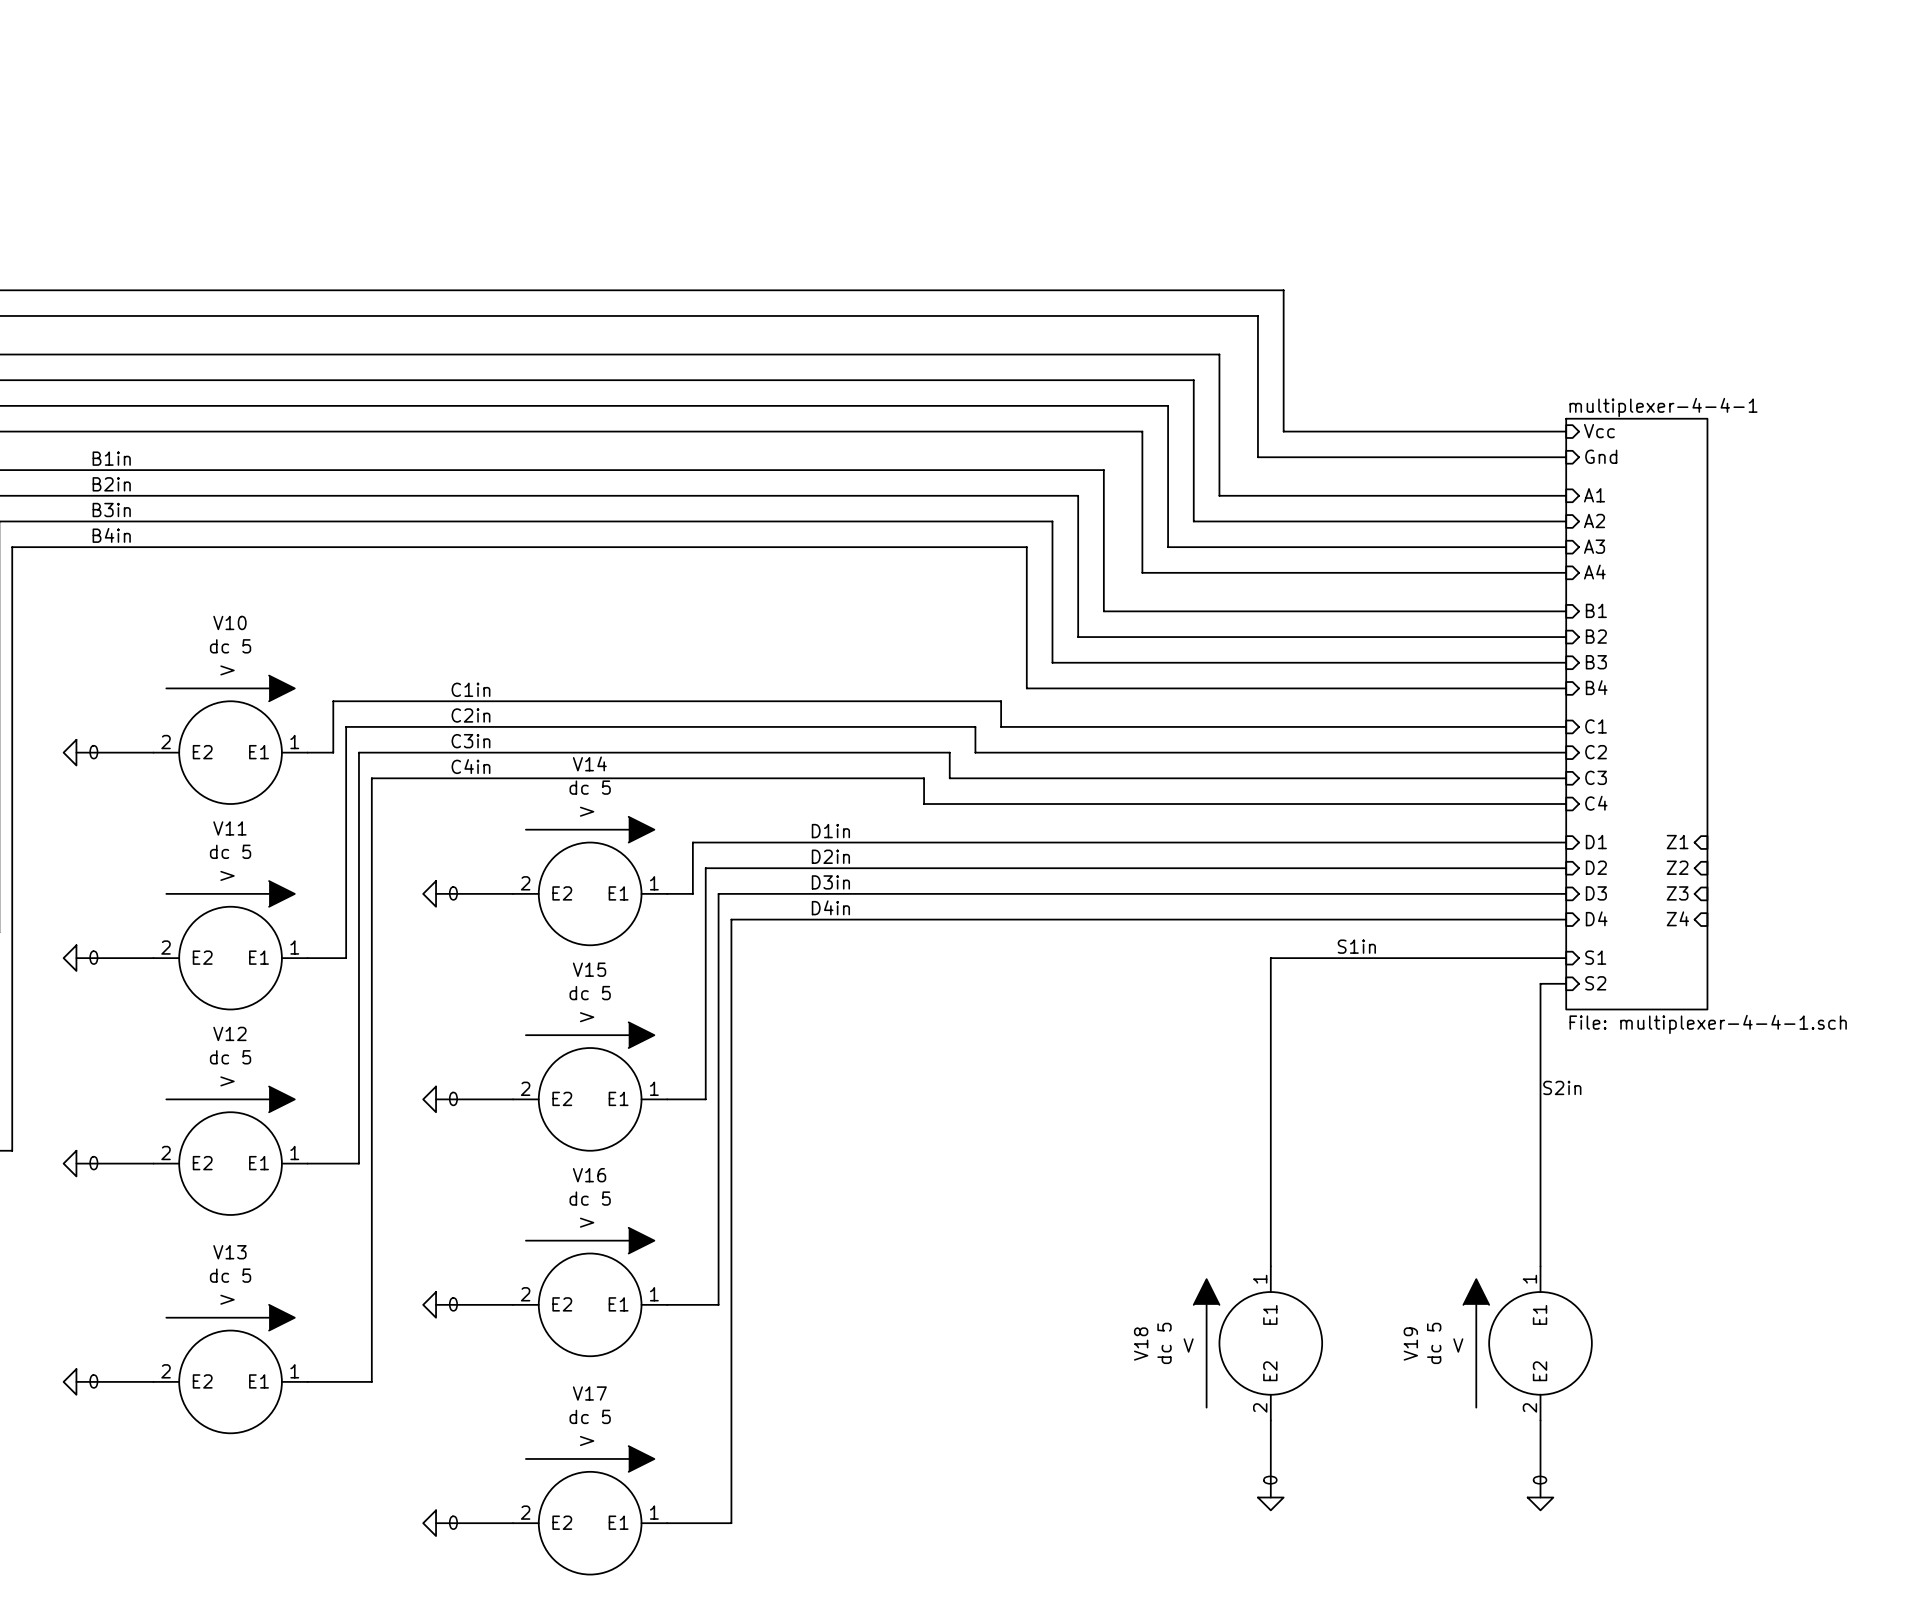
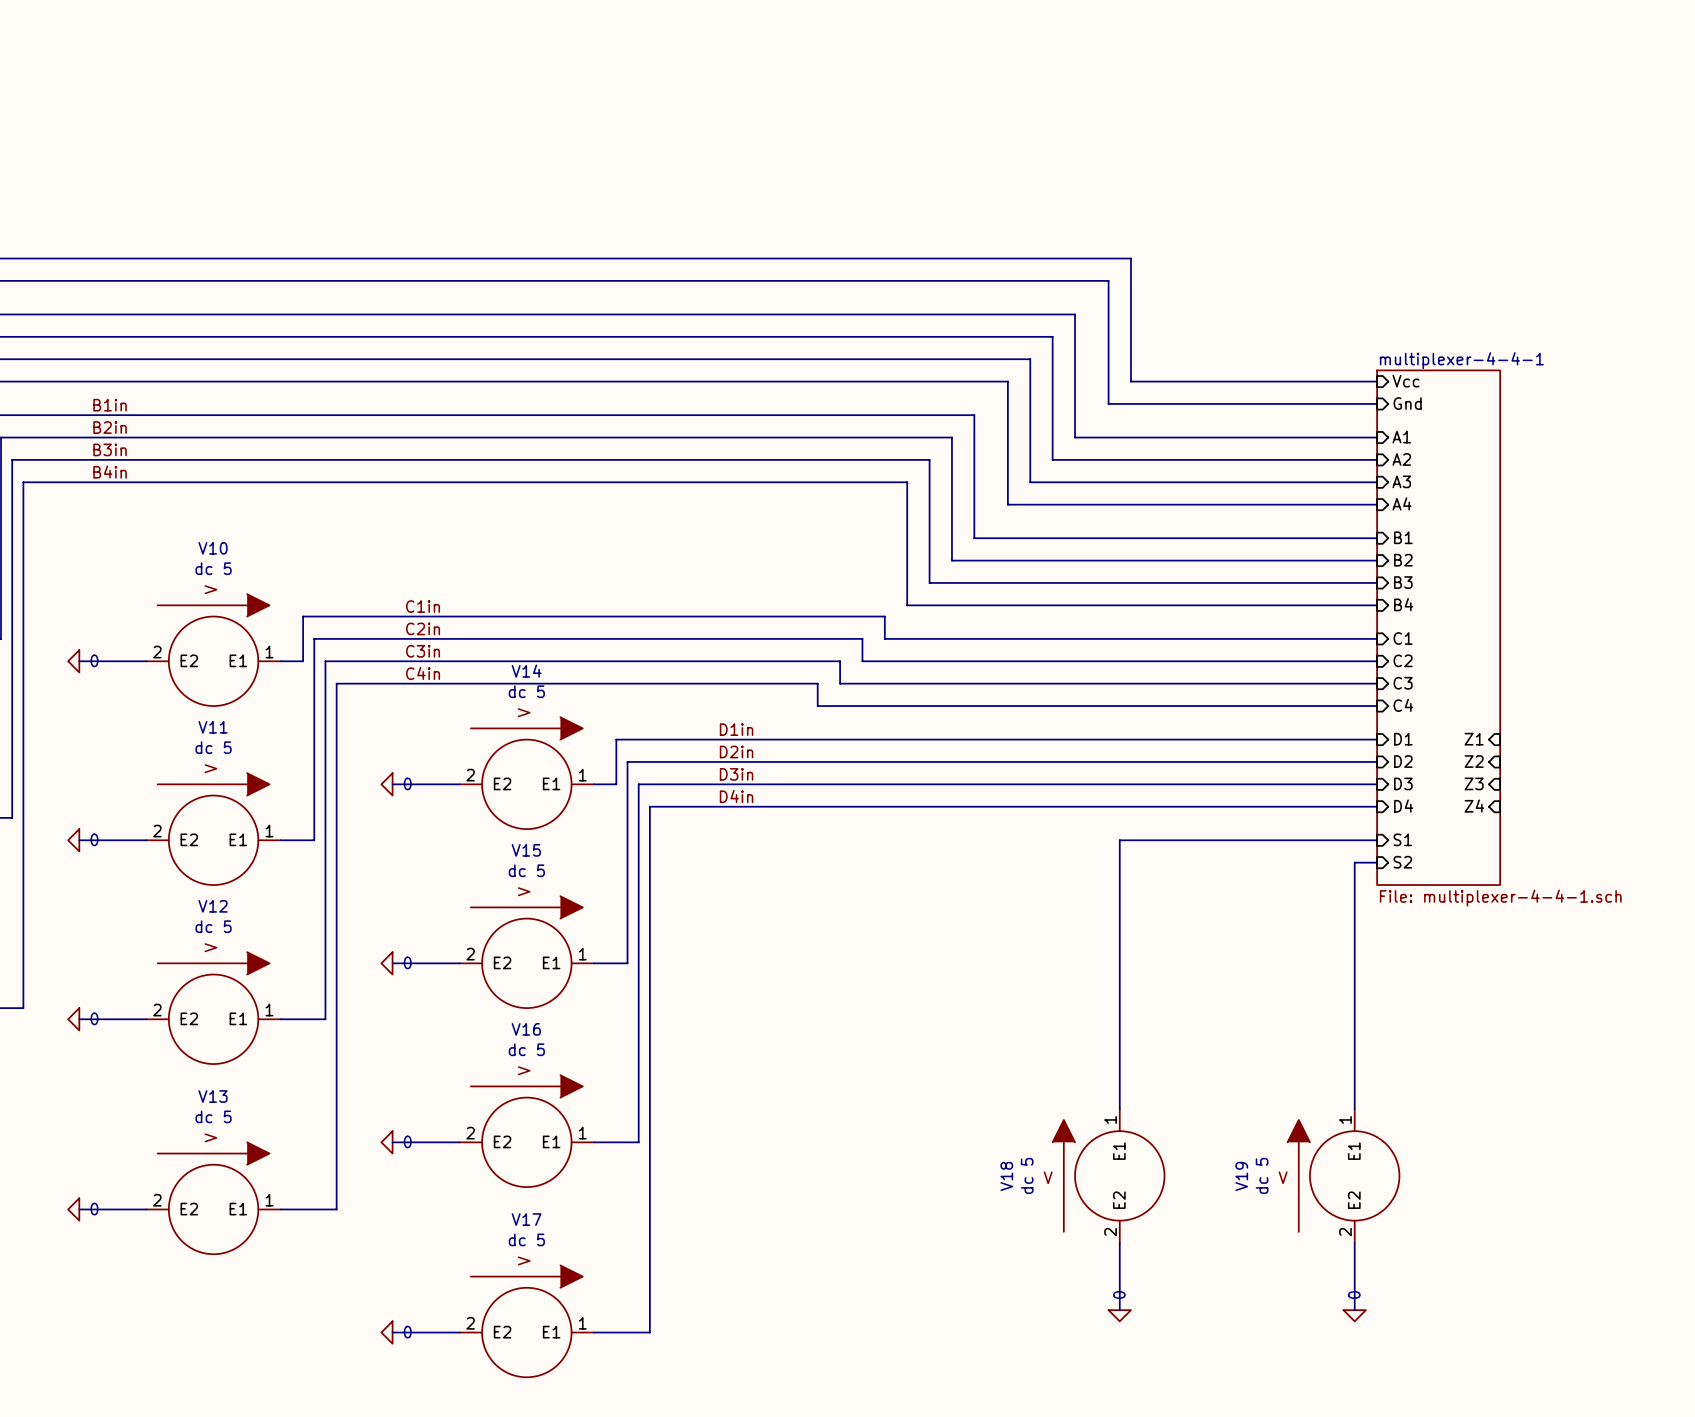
label: S1in (1356, 946) -> none
label: S2in (1562, 1087) -> none

